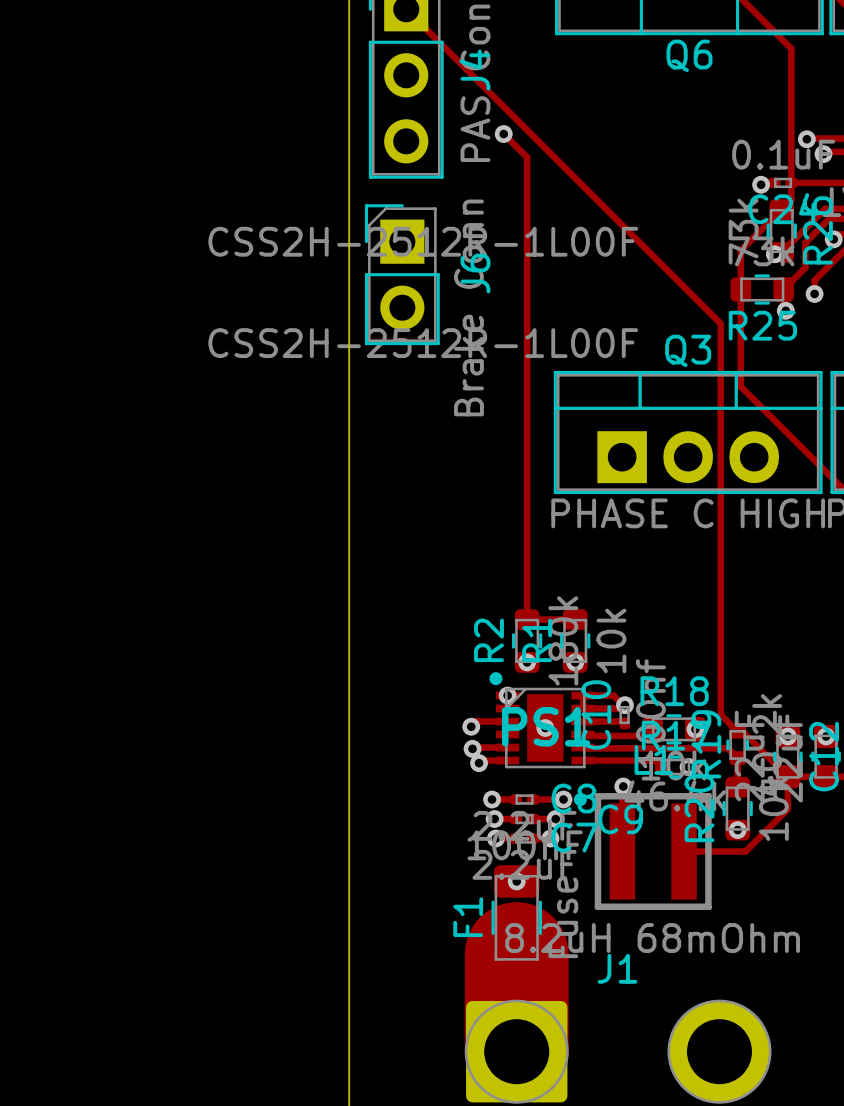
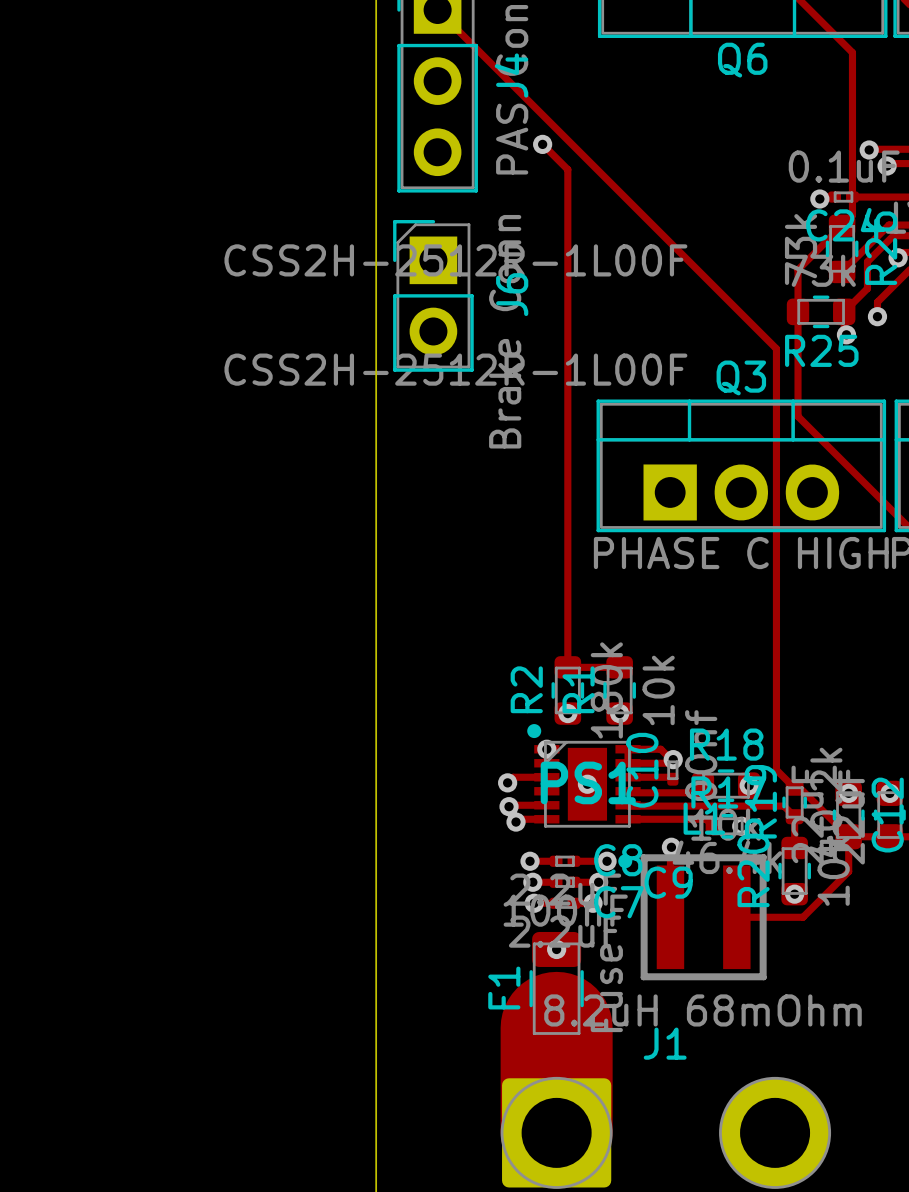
via: (774, 254) -> none

